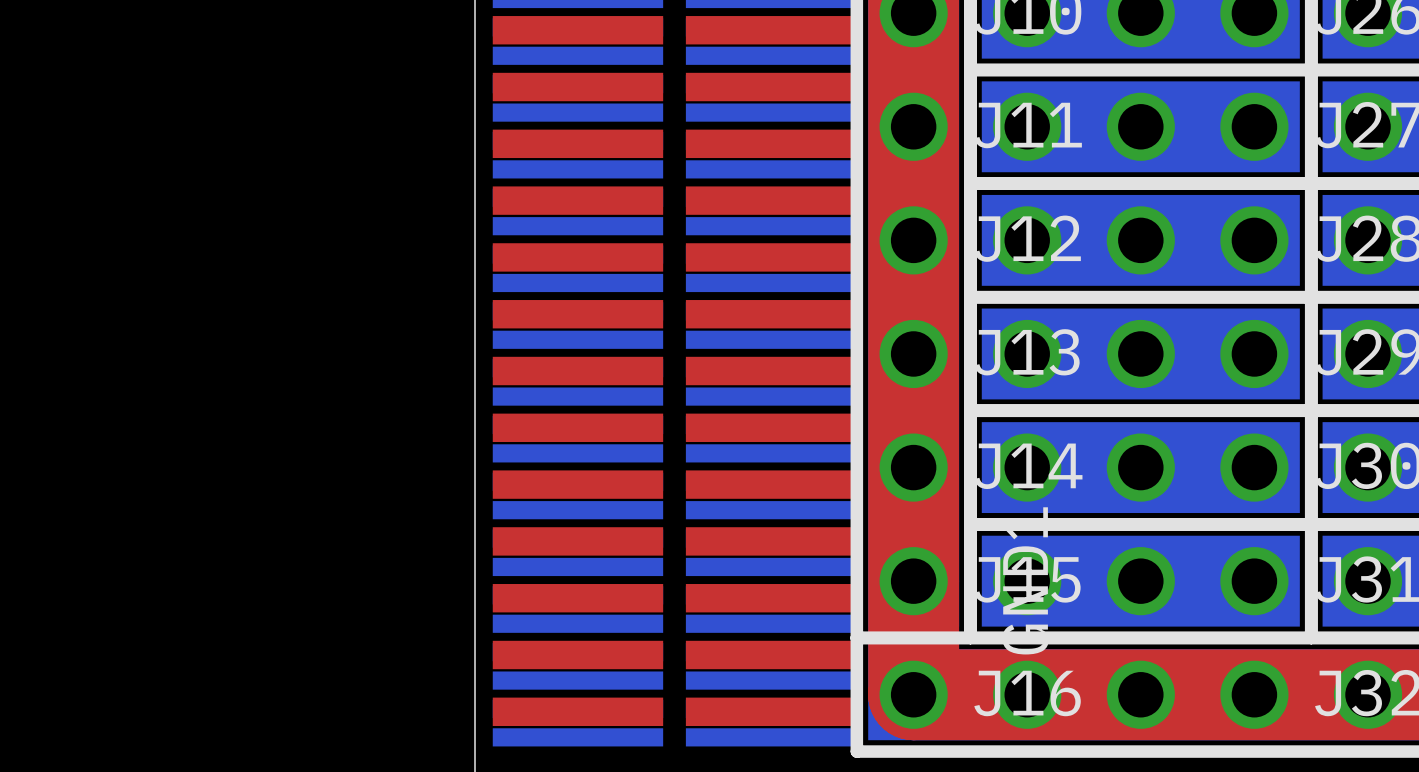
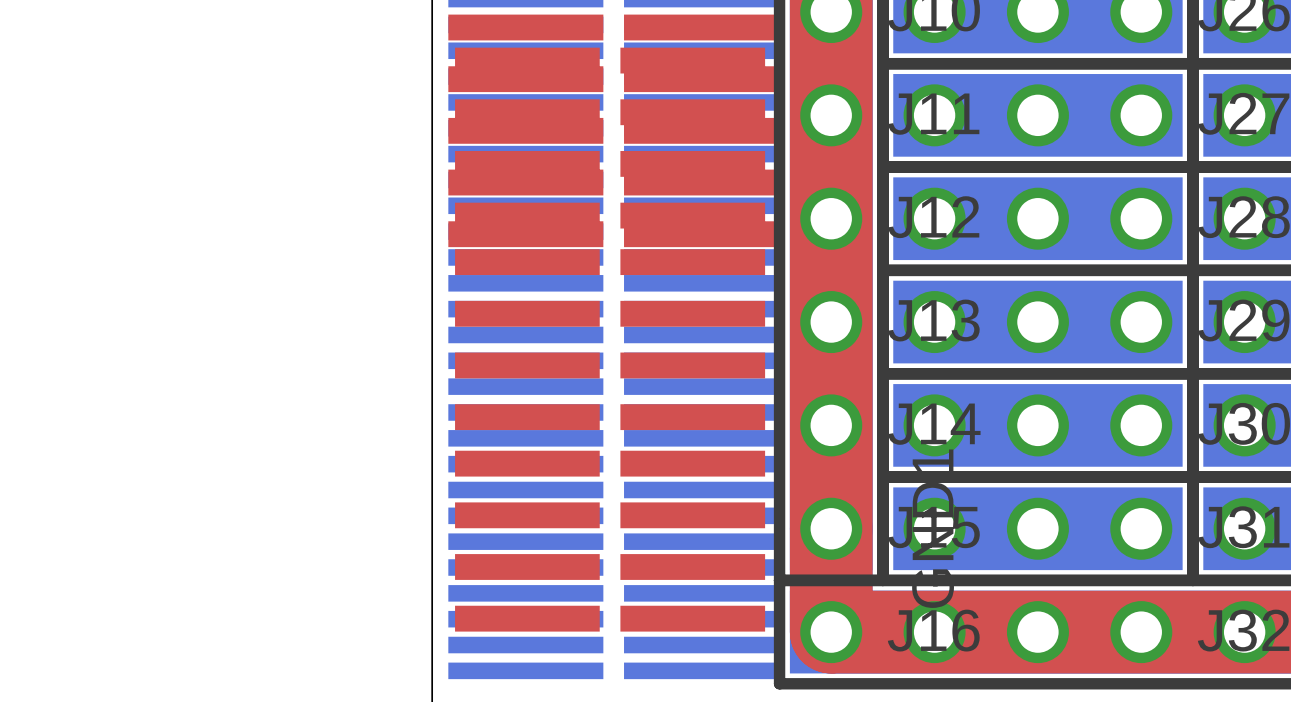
part: none -> (610, 138)
part: none -> (610, 339)
part: (674, 513) -> none
part: none -> (610, 541)

